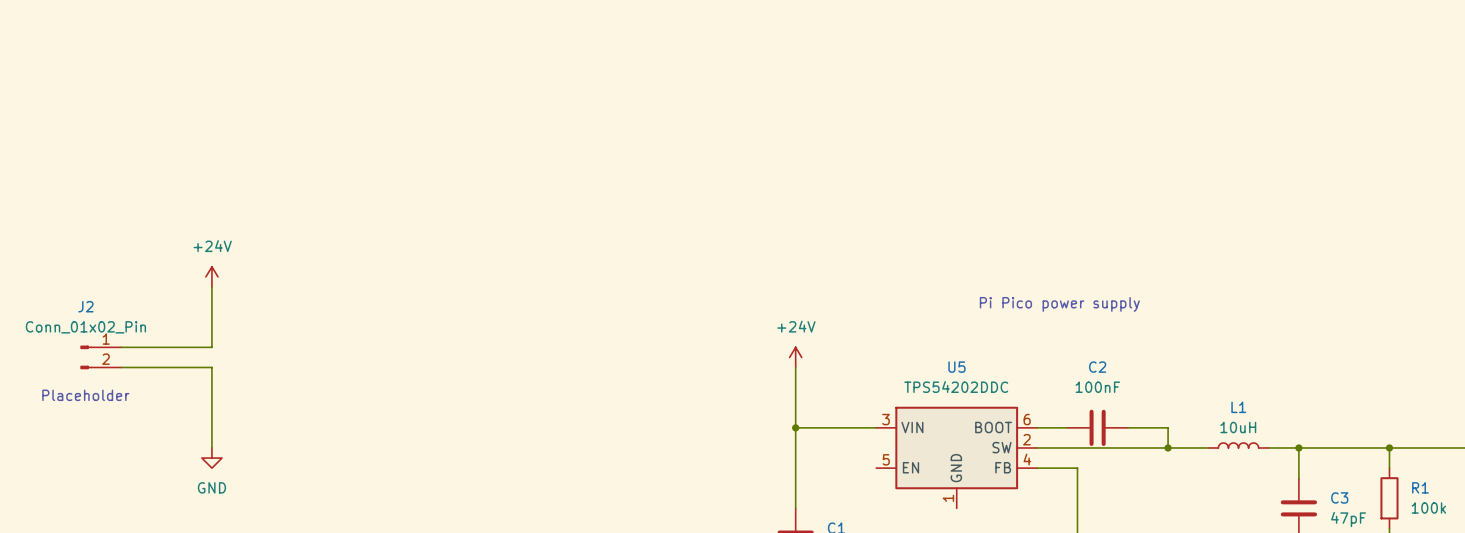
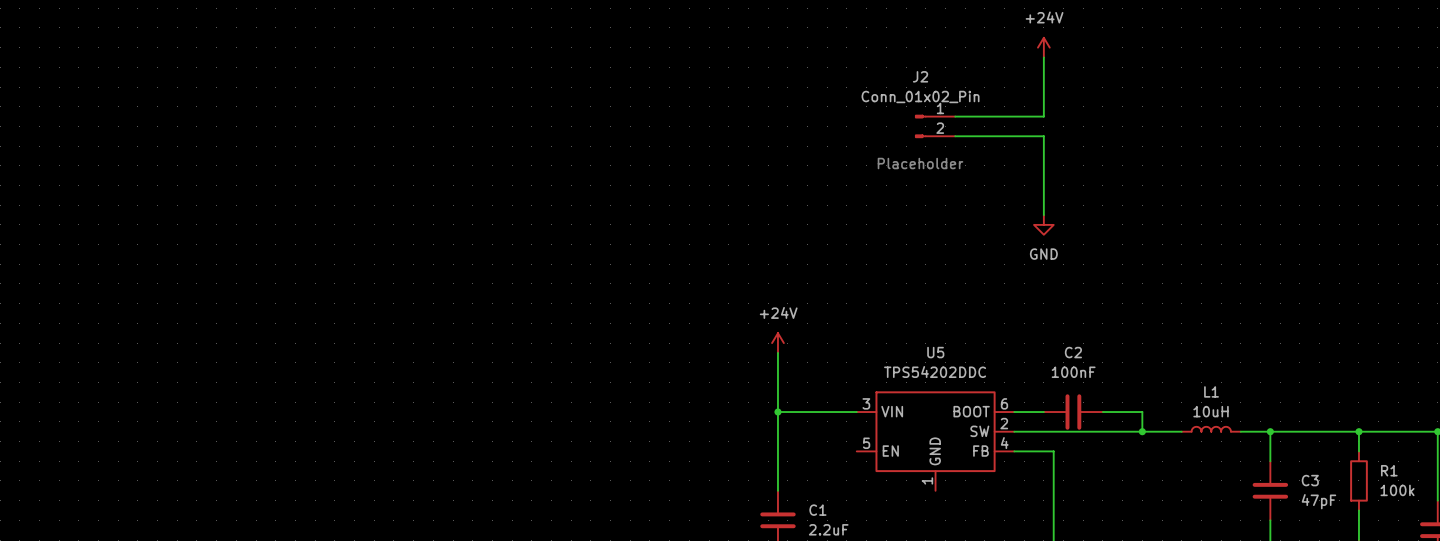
power symbol: none -> +24V (1043, 47)
wire: none -> (1043, 57) (1043, 116) (955, 116)
wire: none -> (955, 136) (1043, 136) (1043, 215)
text: none -> Placeholder (920, 163)
power symbol: none -> GND (1043, 224)
power symbol: +24V (211, 276) -> none
wire: (211, 286) (211, 347) (121, 347) -> none
text: Pi Pico power supply (1059, 304) -> none
J2 position: (100, 357) -> (935, 126)
wire: (121, 367) (211, 367) (211, 447) -> none
text: Placeholder (85, 395) -> none
power symbol: GND (211, 458) -> none

